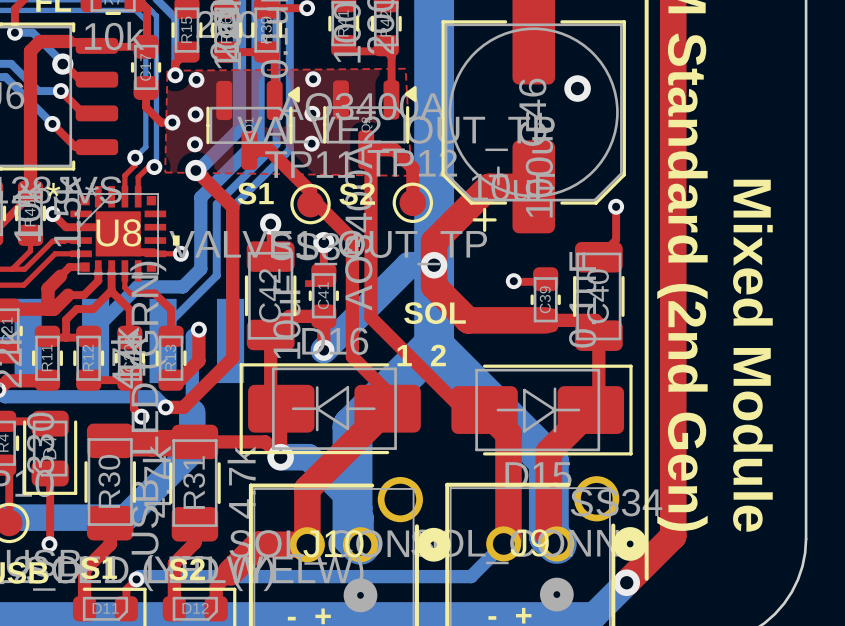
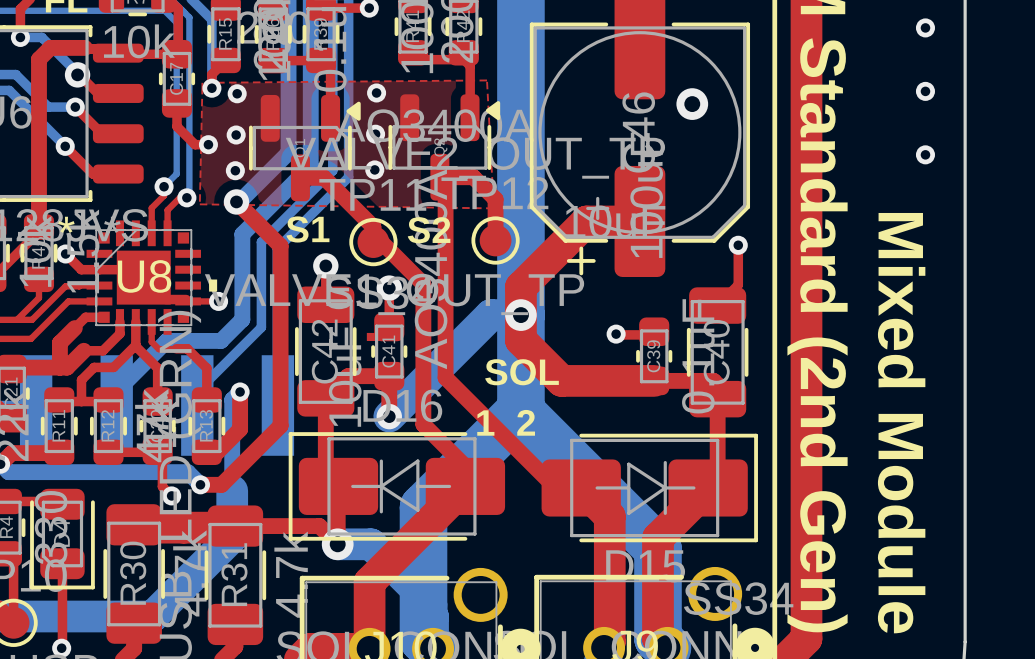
via: none -> (925, 27)
via: none -> (925, 91)
via: none -> (925, 154)

